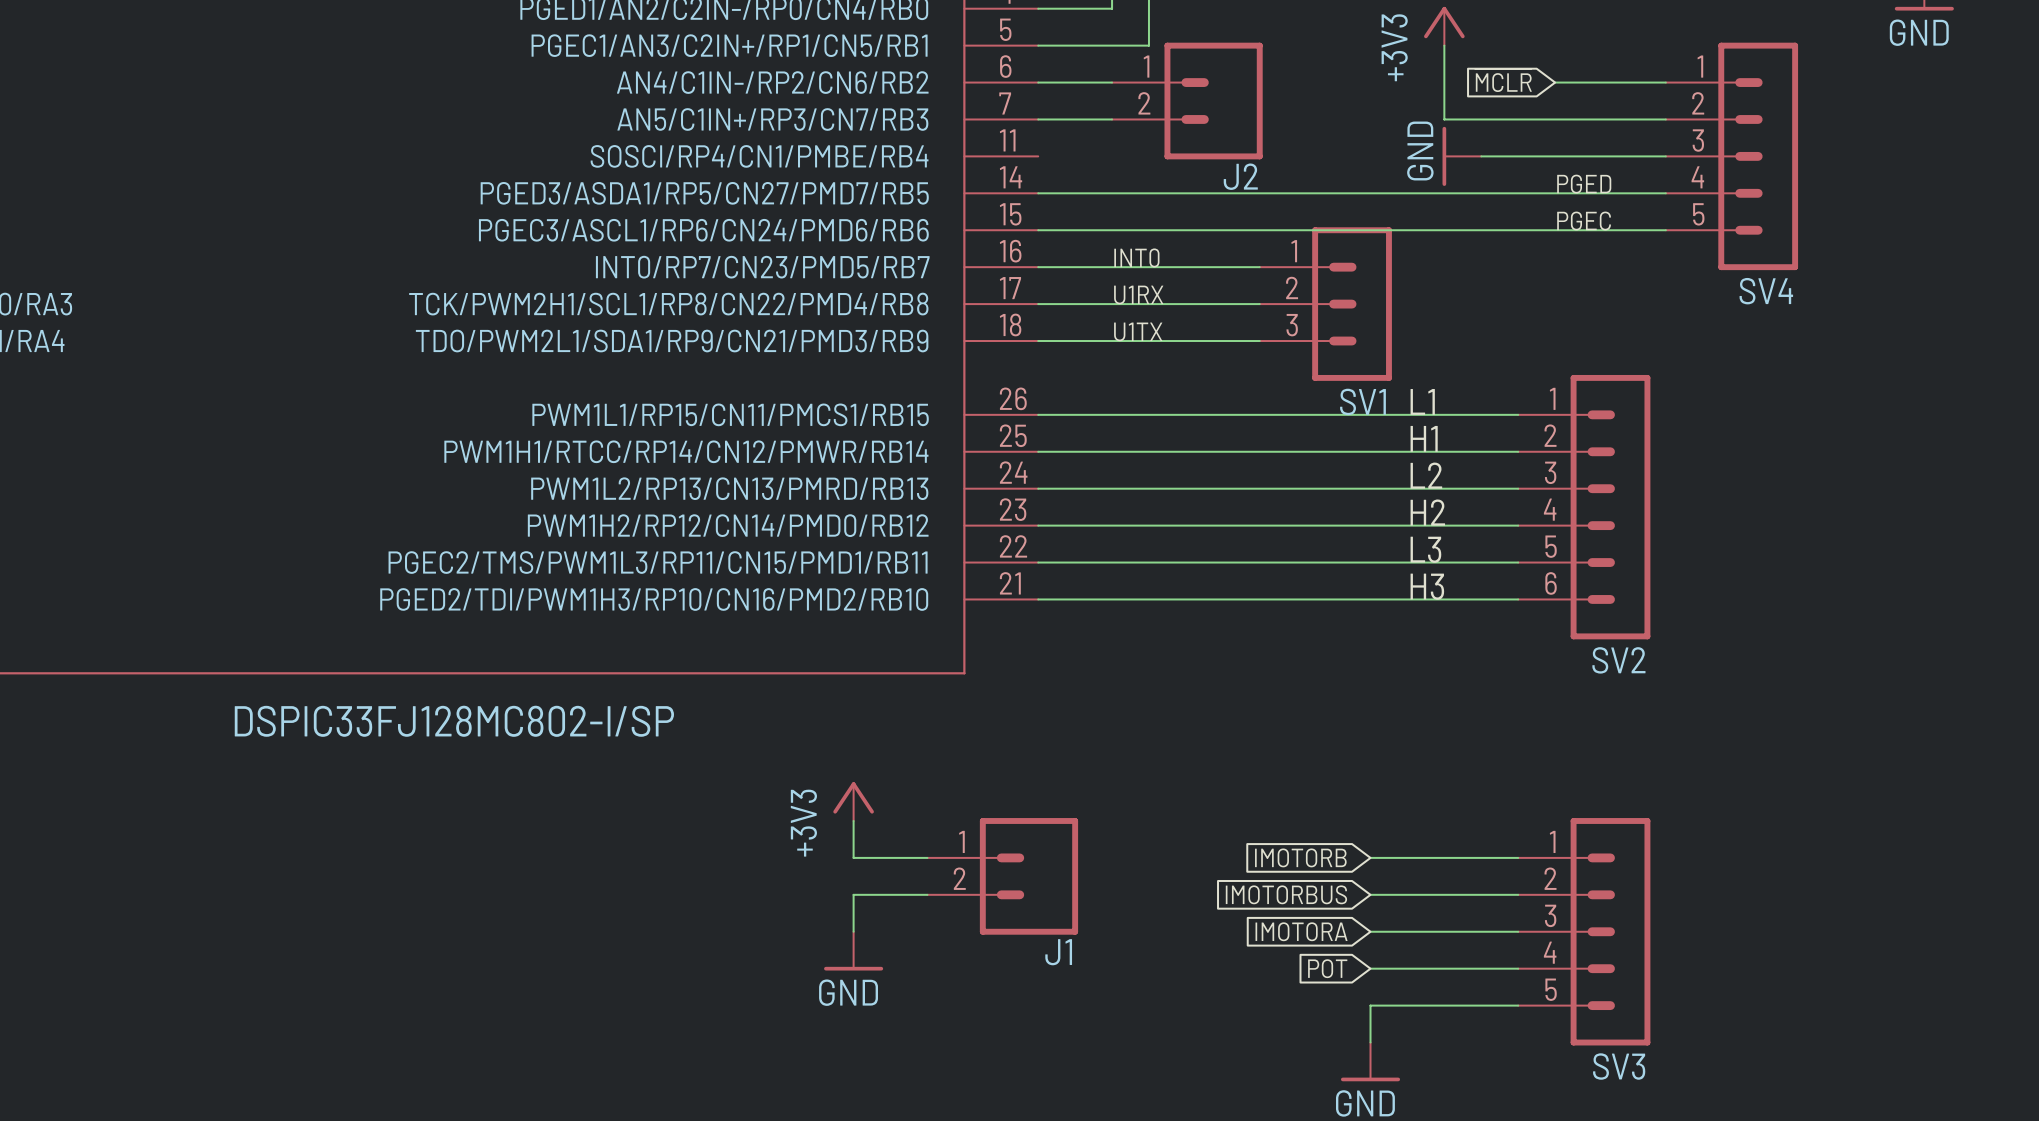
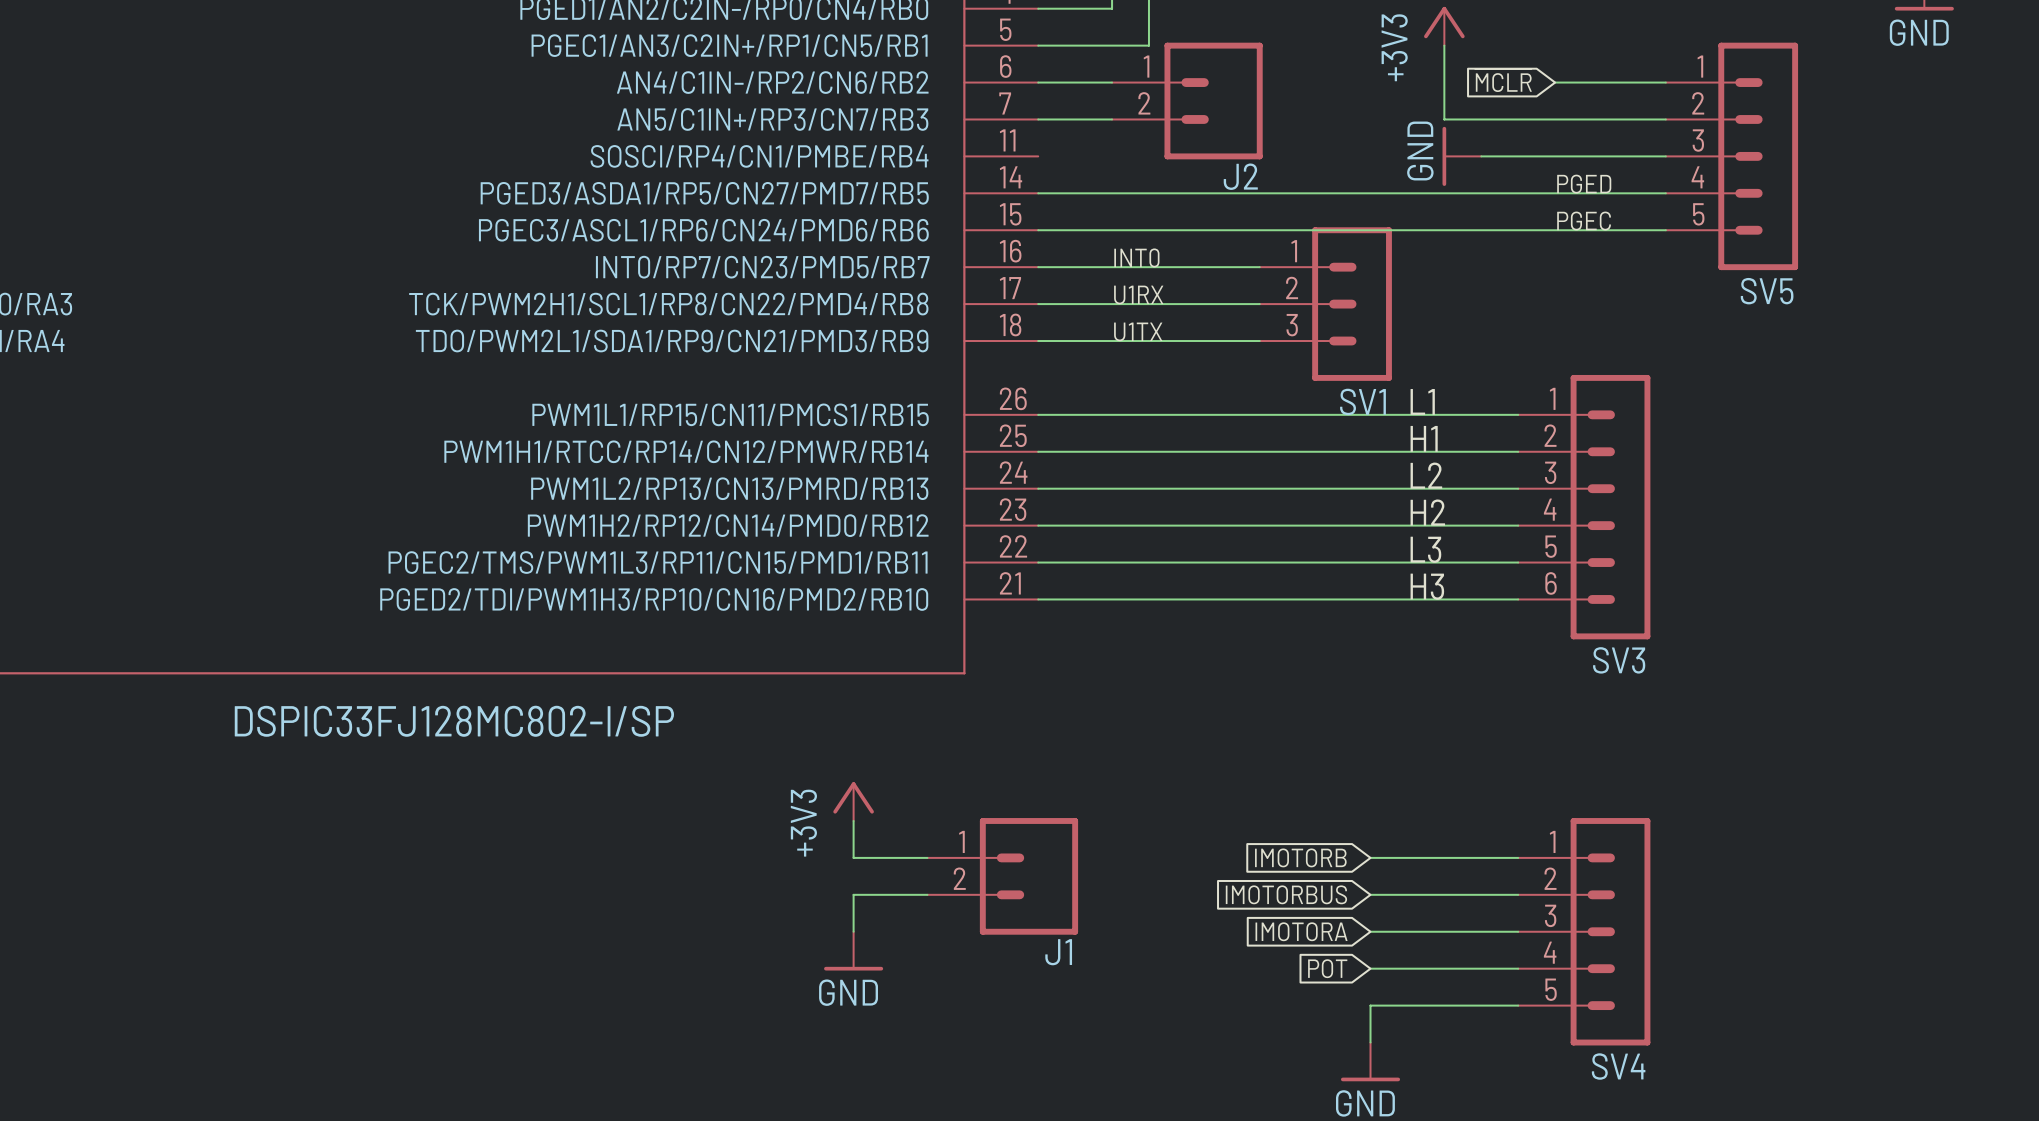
SV4 name: SV4 (1766, 291) -> SV5 (1767, 291)
SV2 name: SV2 (1618, 660) -> SV3 (1619, 660)
SV3 name: SV3 (1619, 1066) -> SV4 (1618, 1066)

